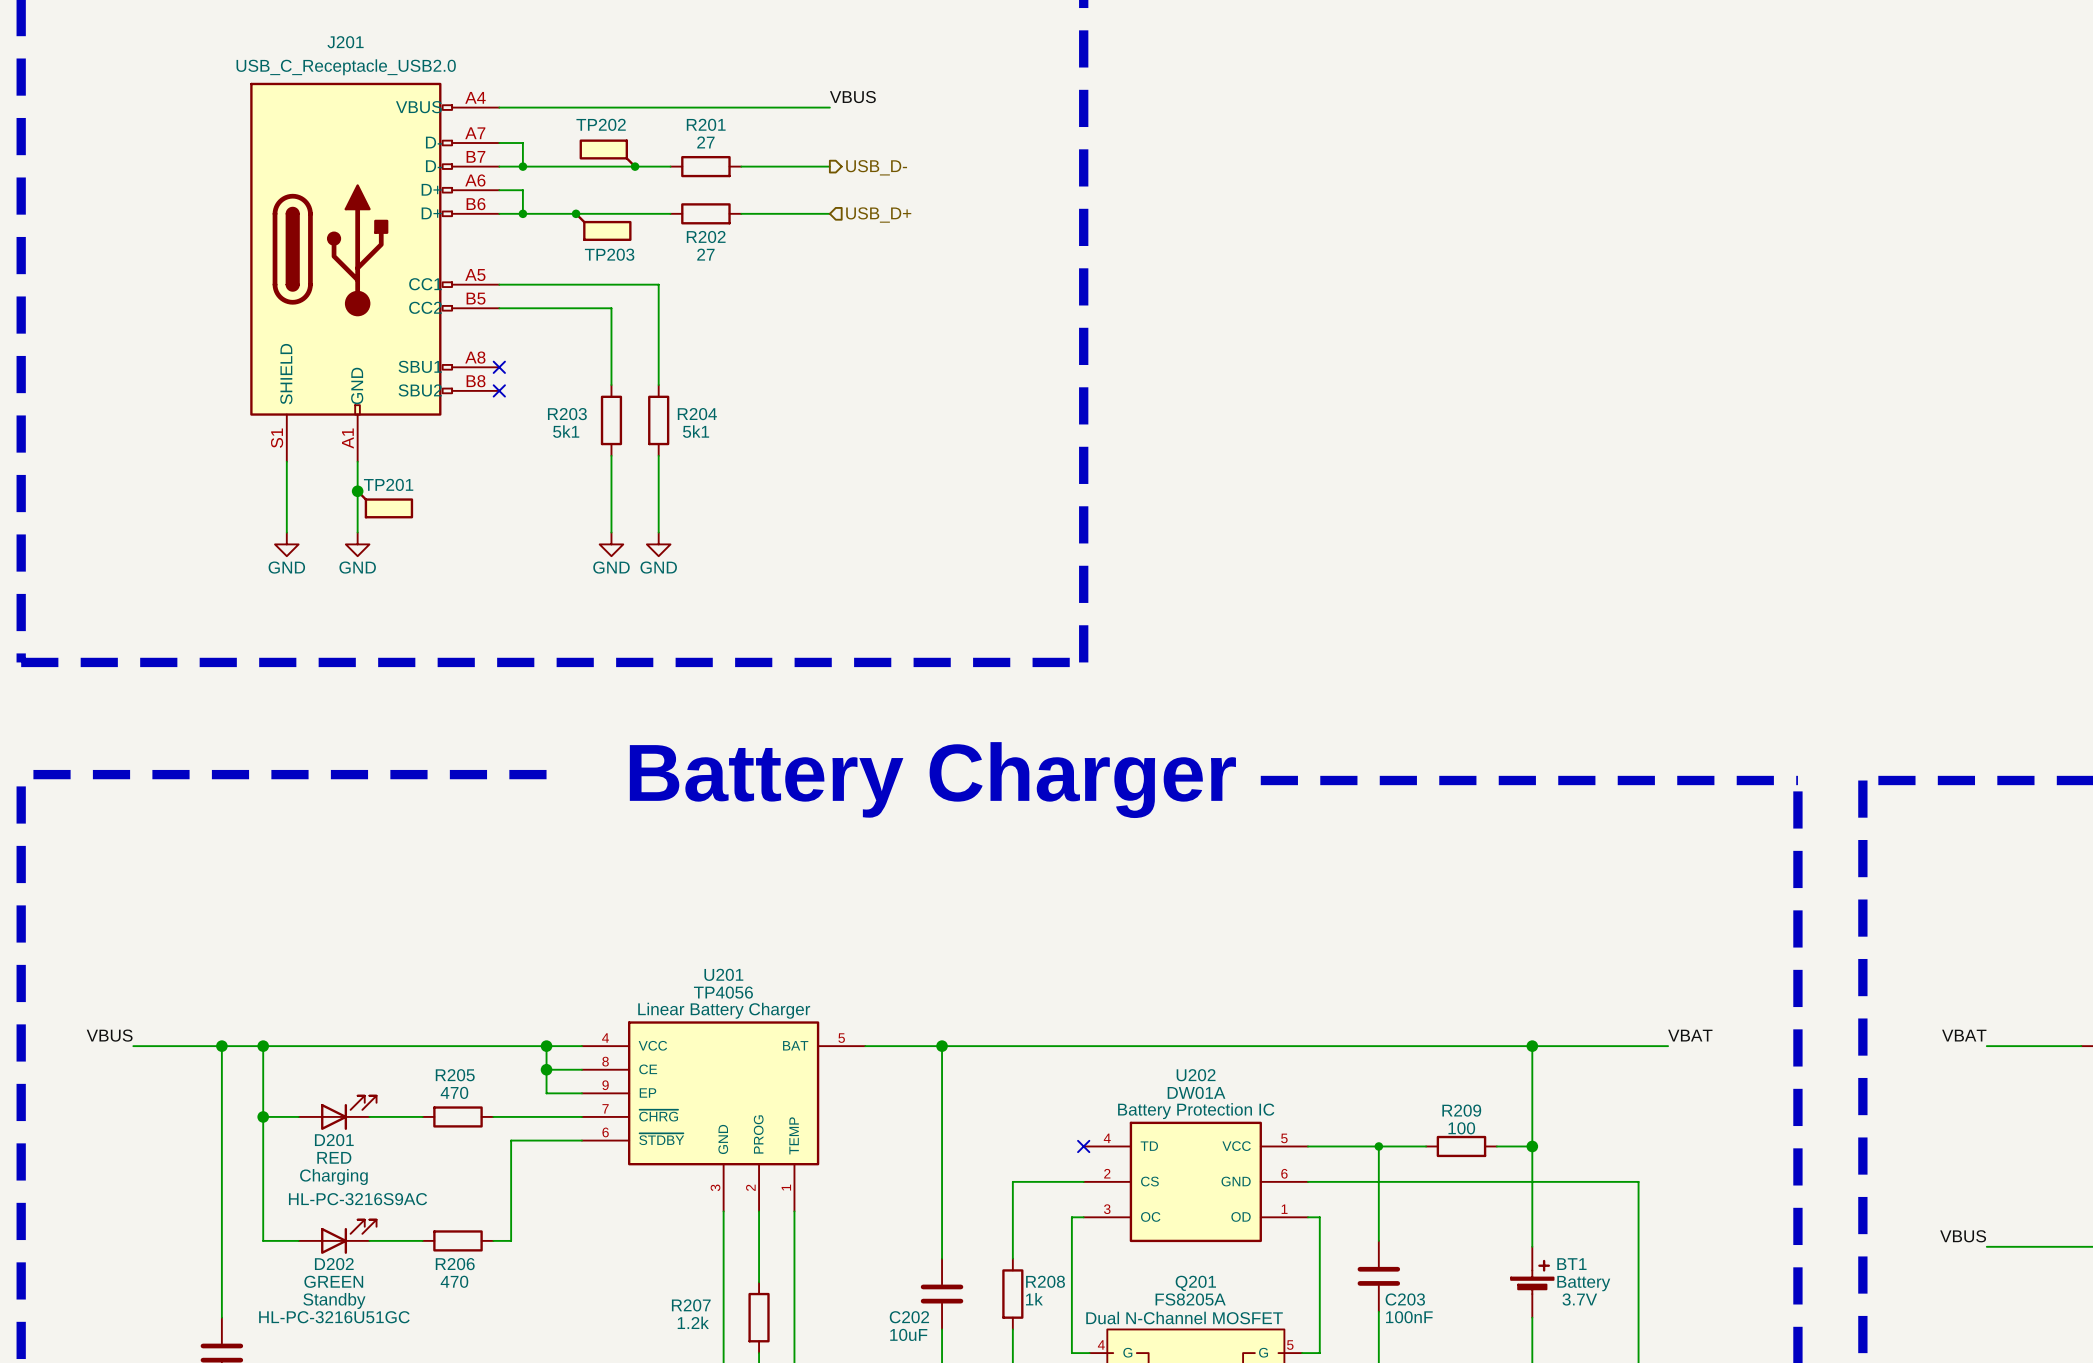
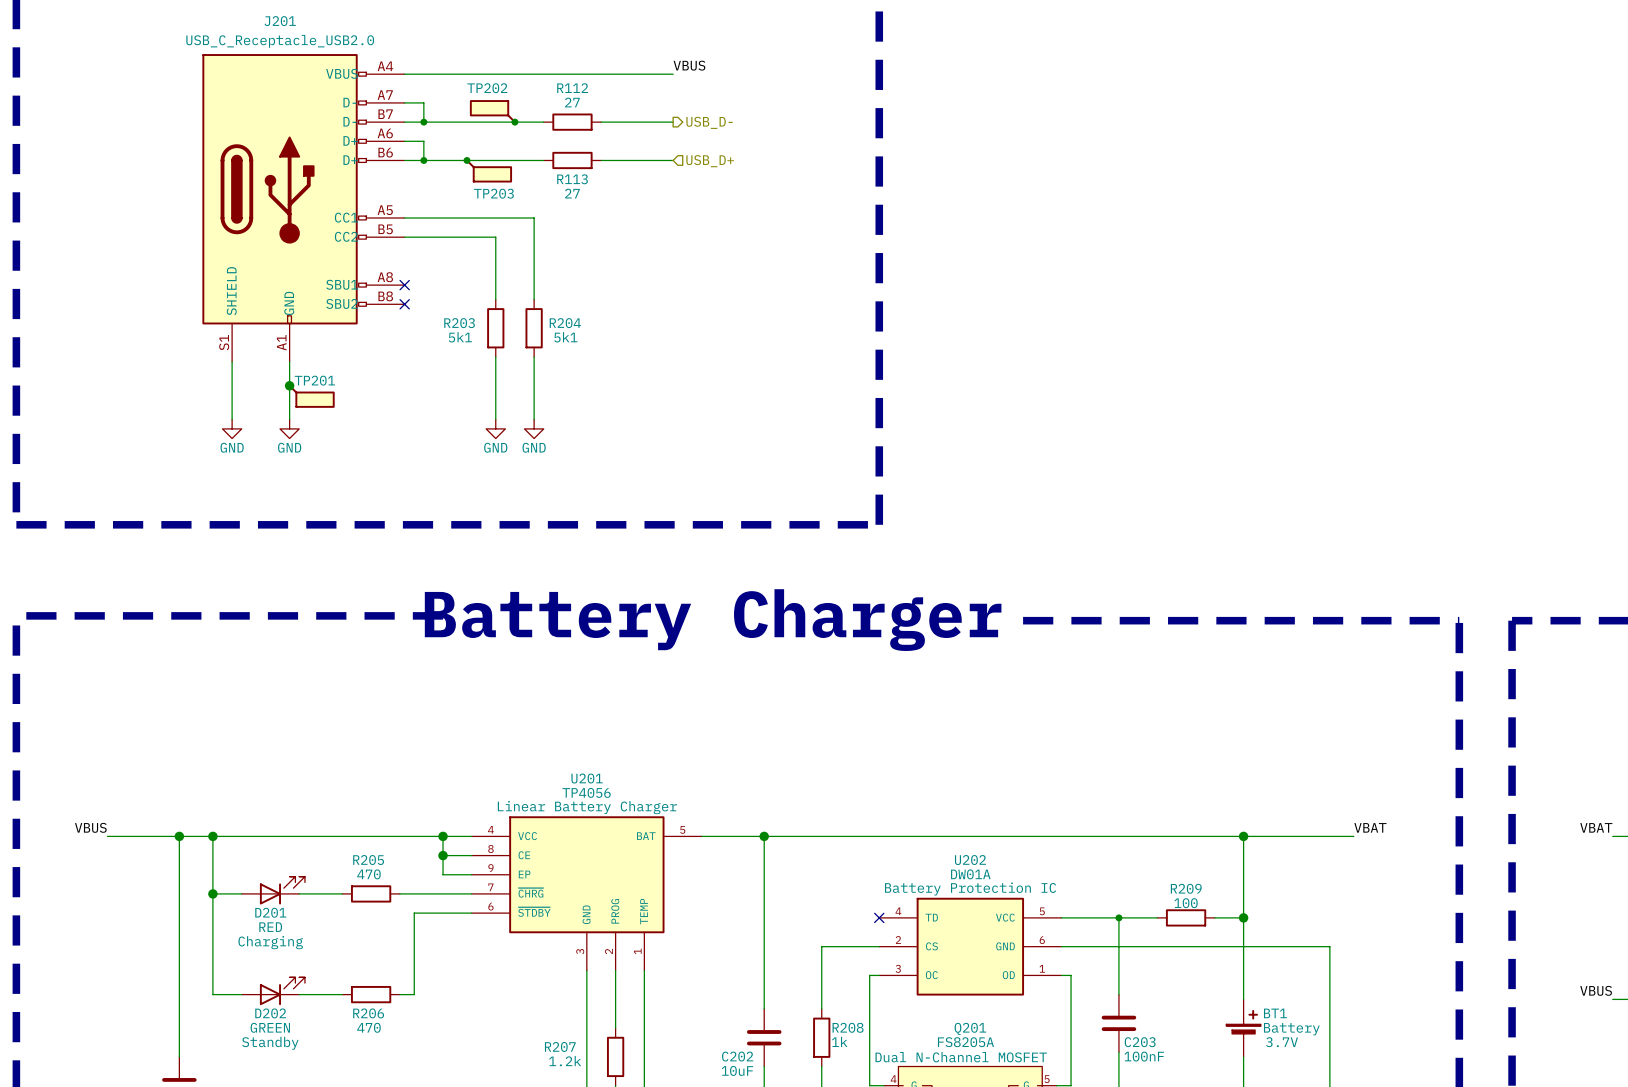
R201 name: R201 (706, 124) -> R112 (572, 88)
R202 name: R202 (706, 237) -> R113 (572, 179)
D201 text: HL-PC-3216S9AC (358, 1199) -> none
D202 text: HL-PC-3216U51GC (334, 1317) -> none

